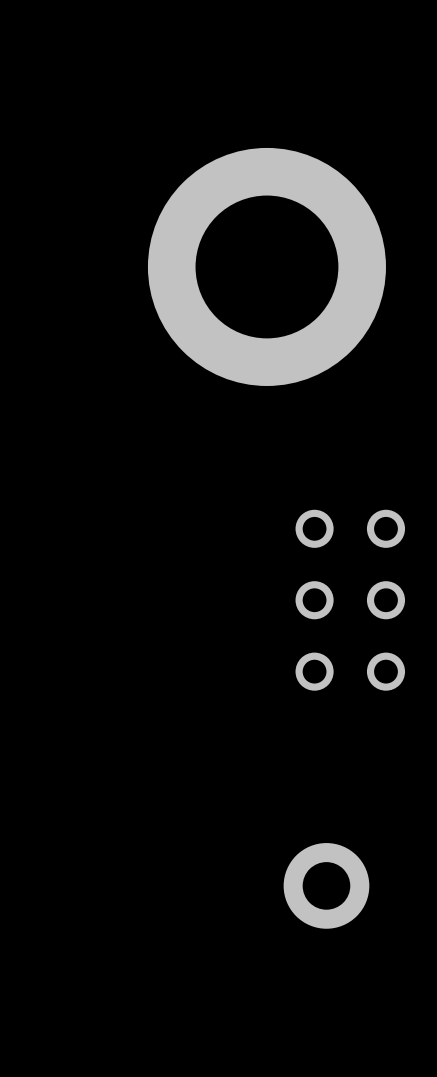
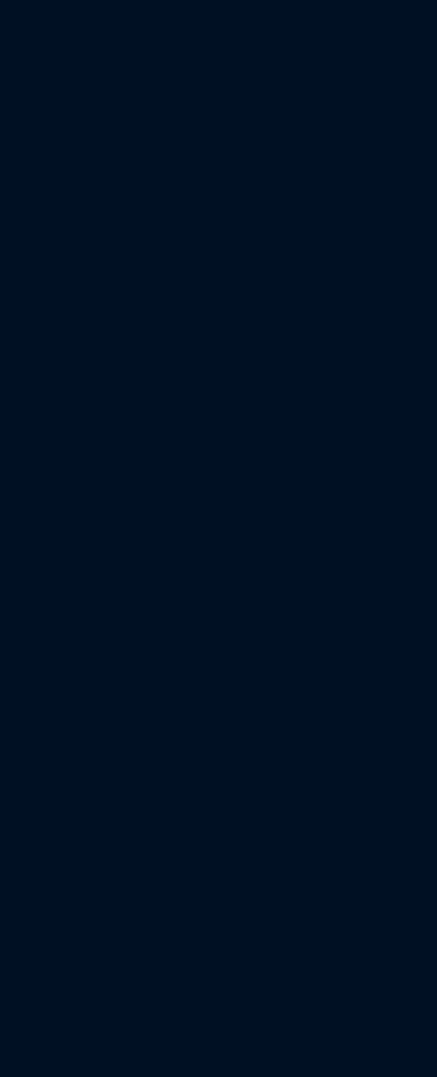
via: (266, 266) -> none
via: (314, 528) -> none
via: (385, 528) -> none
via: (314, 600) -> none
via: (385, 600) -> none
via: (314, 671) -> none
via: (385, 671) -> none
via: (326, 885) -> none

